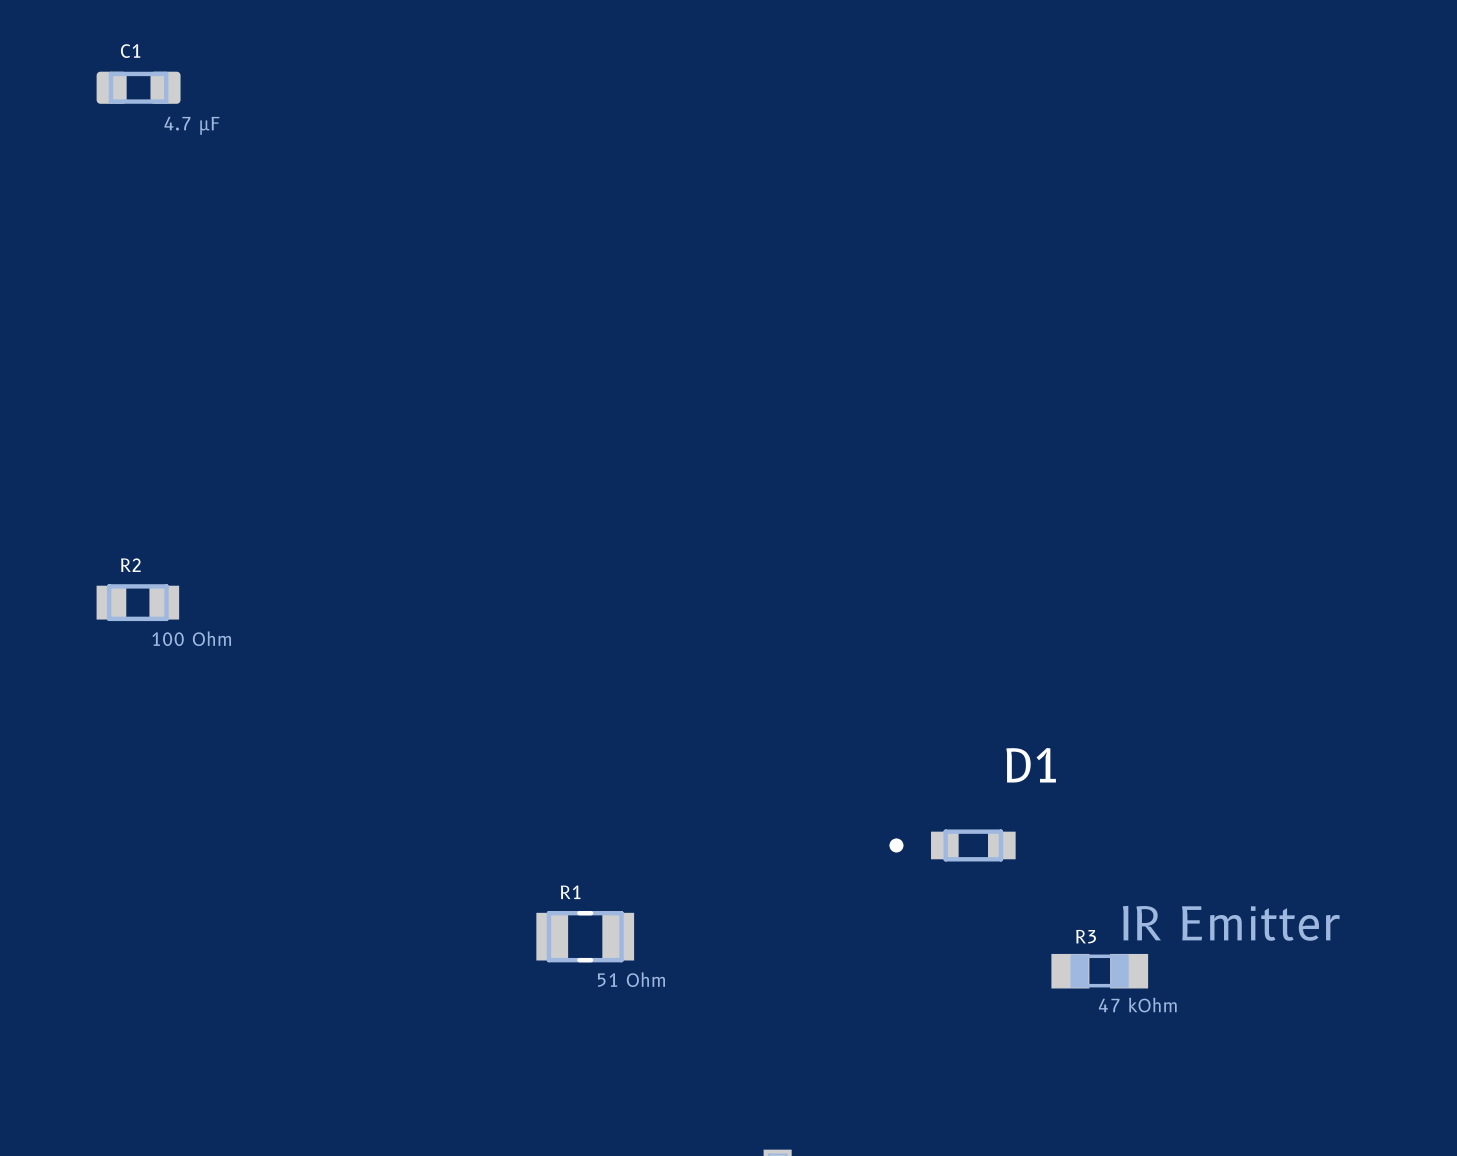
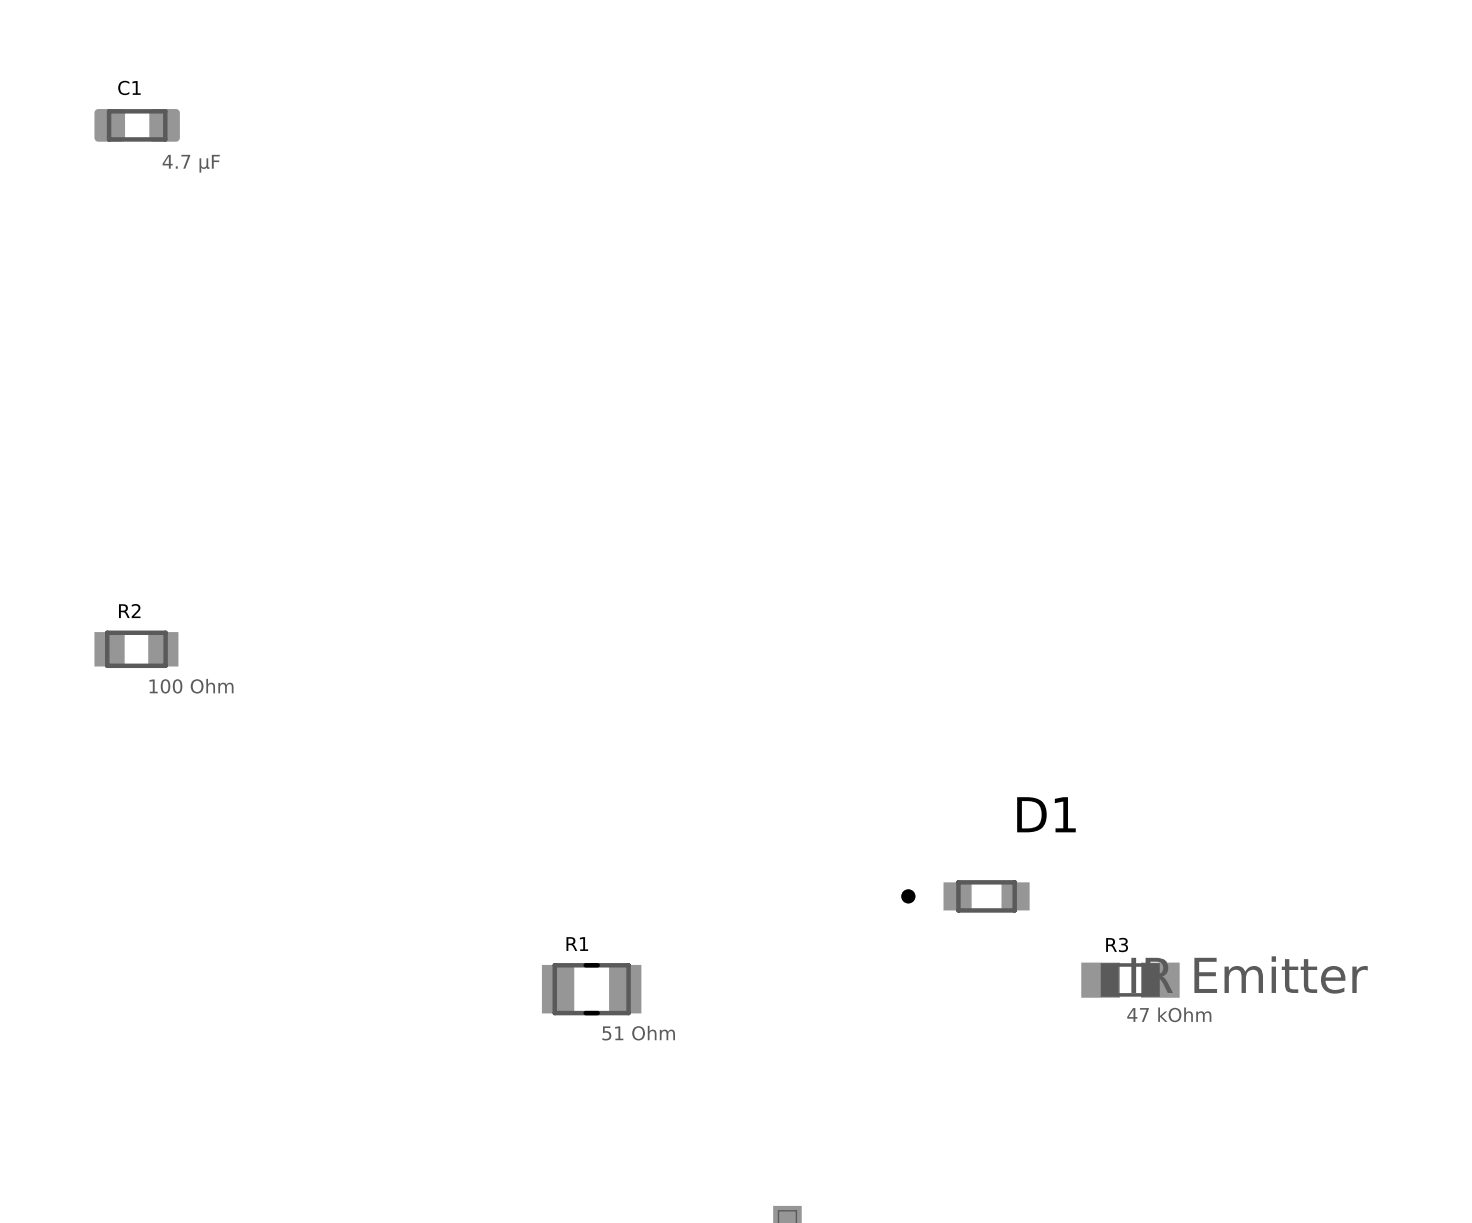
R3 position: (1099, 971) -> (1130, 980)

